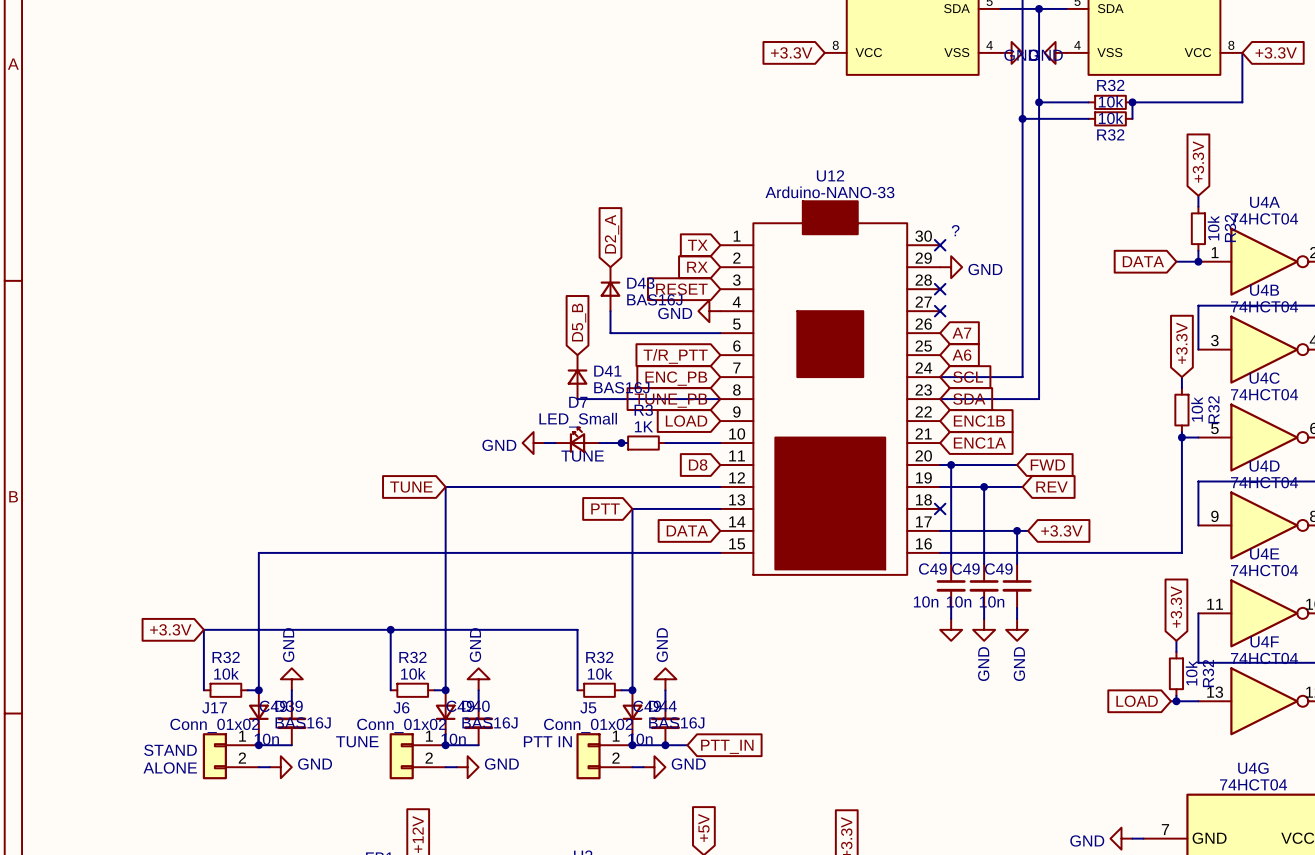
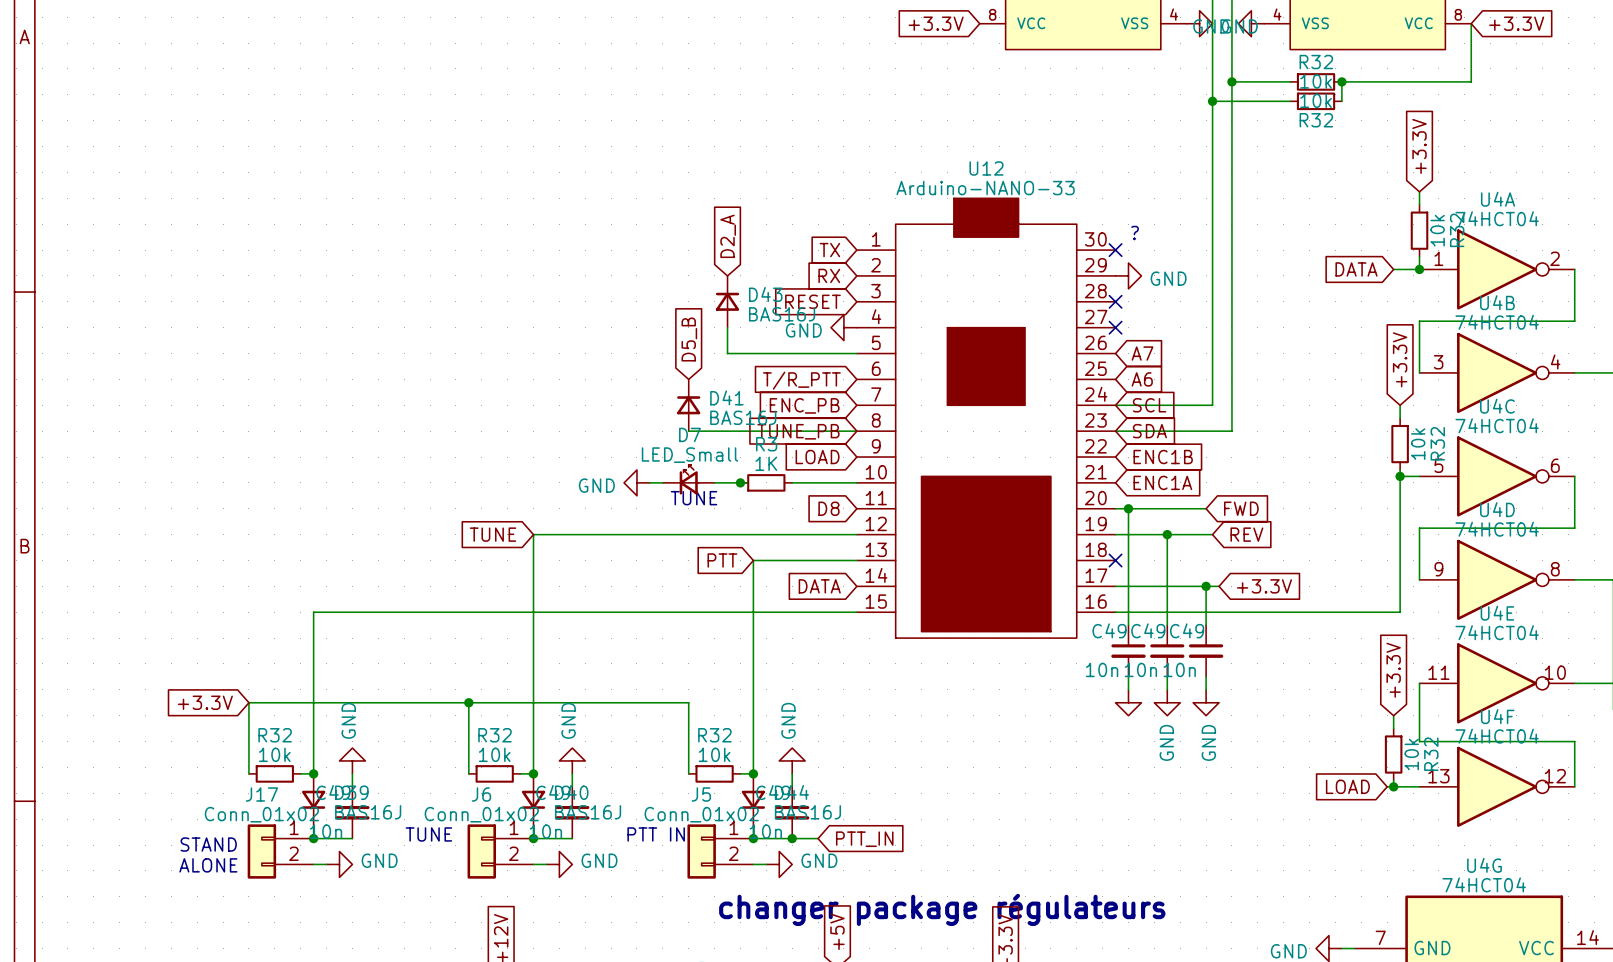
text: none -> changer package régulateurs (942, 909)

